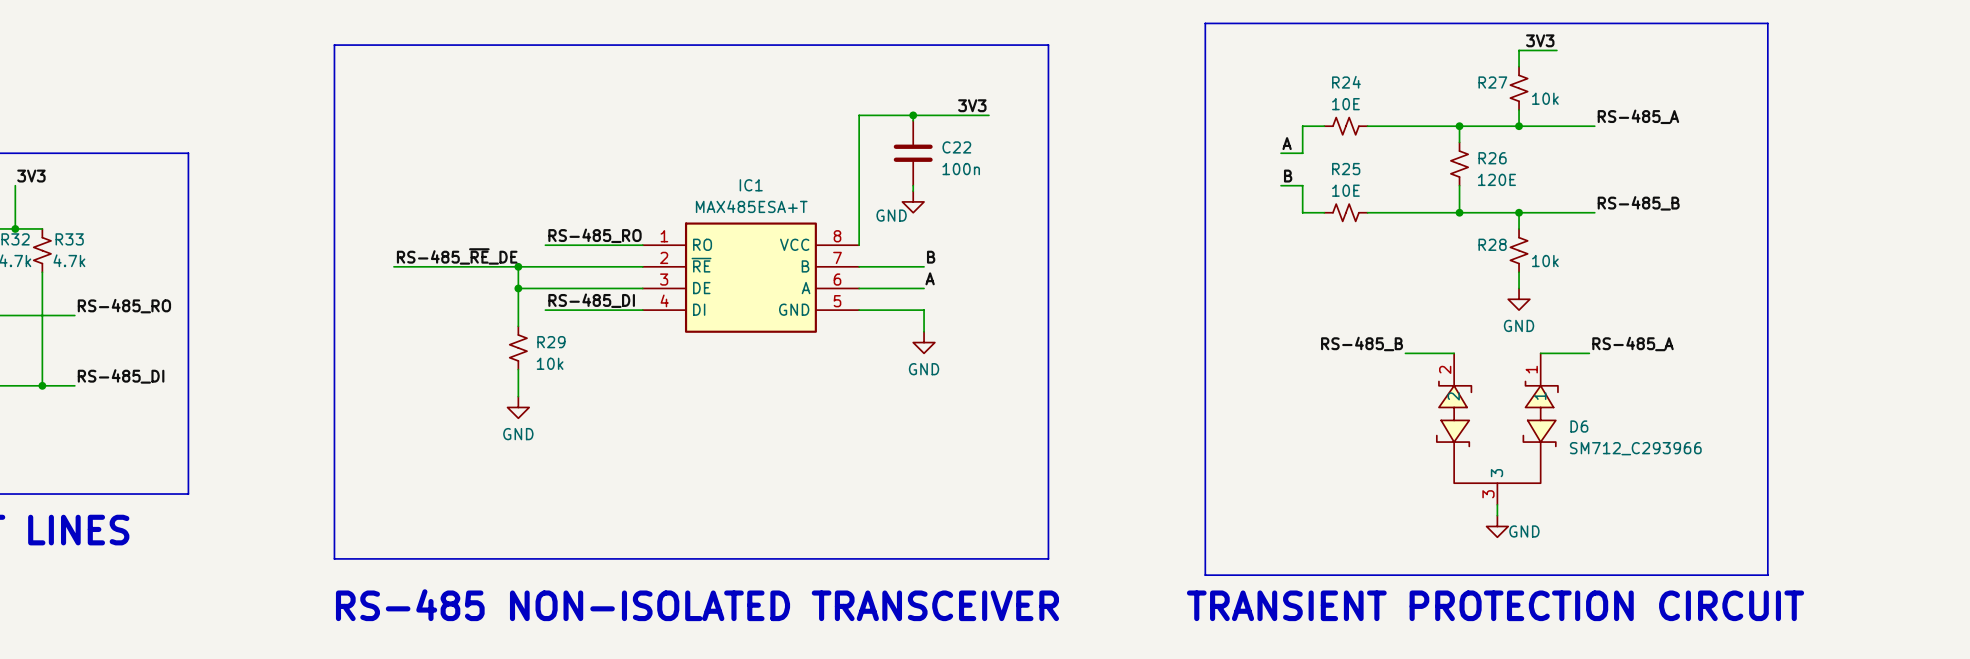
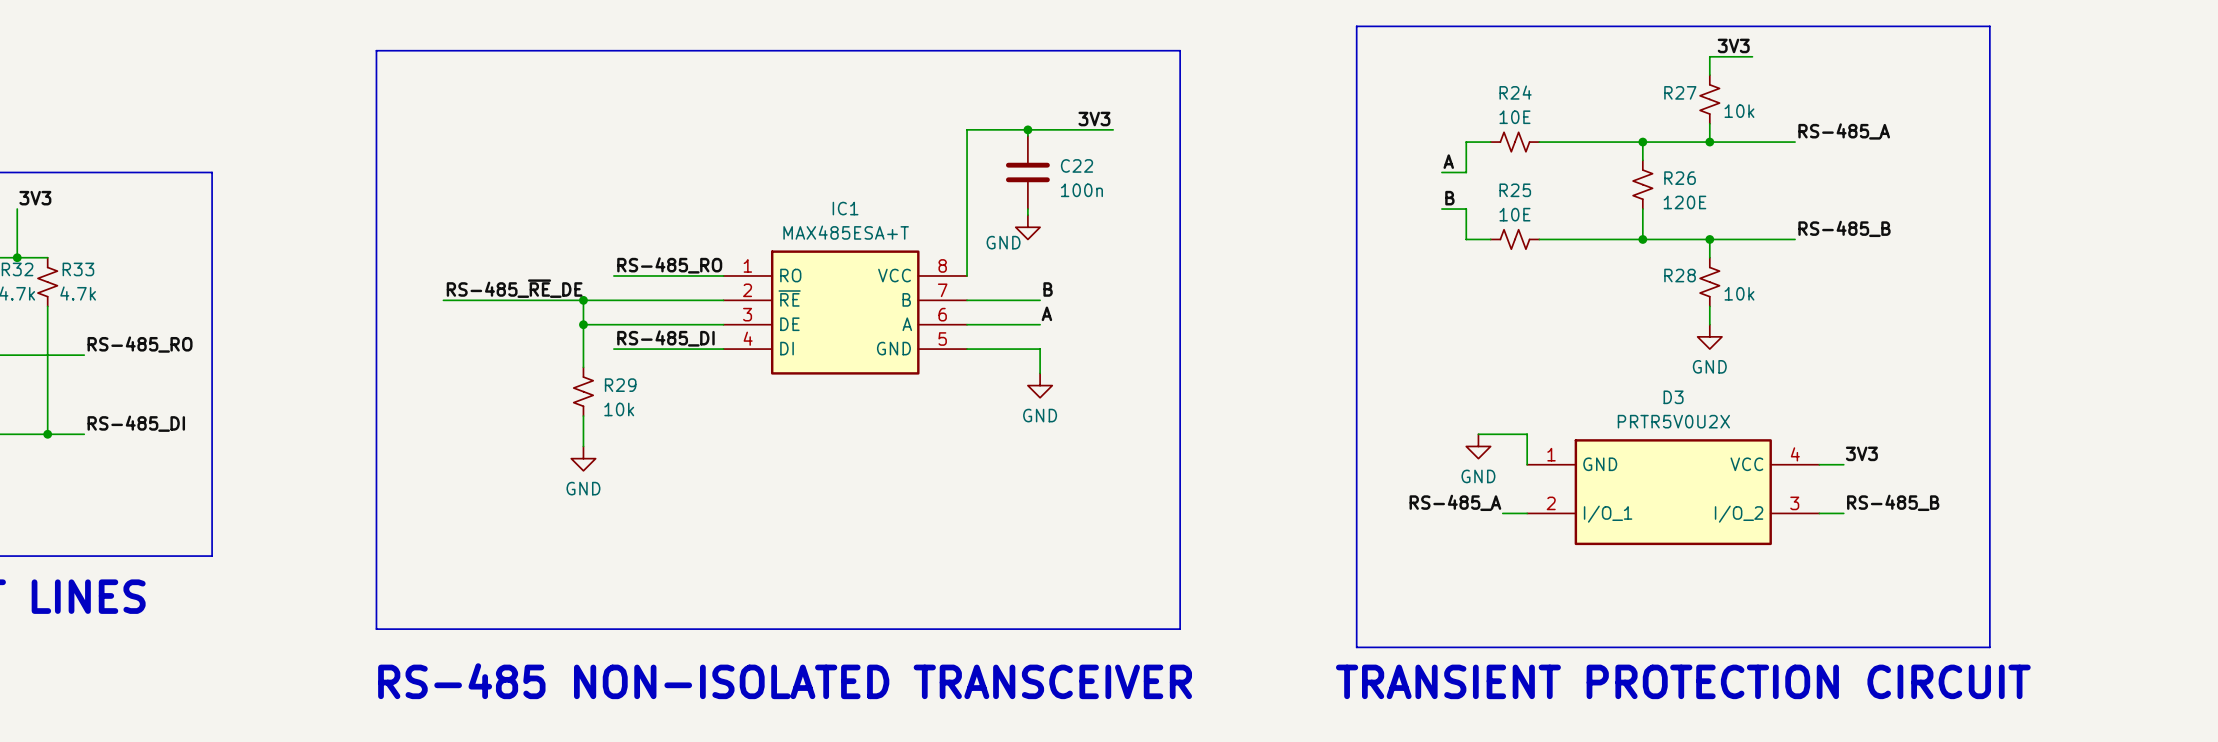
label: RS-485_B (1362, 343) -> none
label: RS-485_A (1633, 343) -> none
wire: (1405, 353) (1454, 353) -> none
wire: (1540, 353) (1589, 353) -> none
wire: none -> (1478, 434) (1527, 434) (1527, 464)
power symbol: none -> GND (1478, 446)
label: none -> 3V3 (1861, 453)
wire: none -> (1819, 464) (1843, 464)
D6: SM712_C293966 (1497, 429) -> none
D3: none -> PRTR5V0U2X (1673, 492)
label: none -> RS-485_A (1455, 502)
label: none -> RS-485_B (1893, 502)
wire: none -> (1502, 513) (1527, 513)
wire: none -> (1819, 513) (1843, 513)
wire: (1497, 504) (1497, 515) -> none
power symbol: GND (1497, 526) -> none

